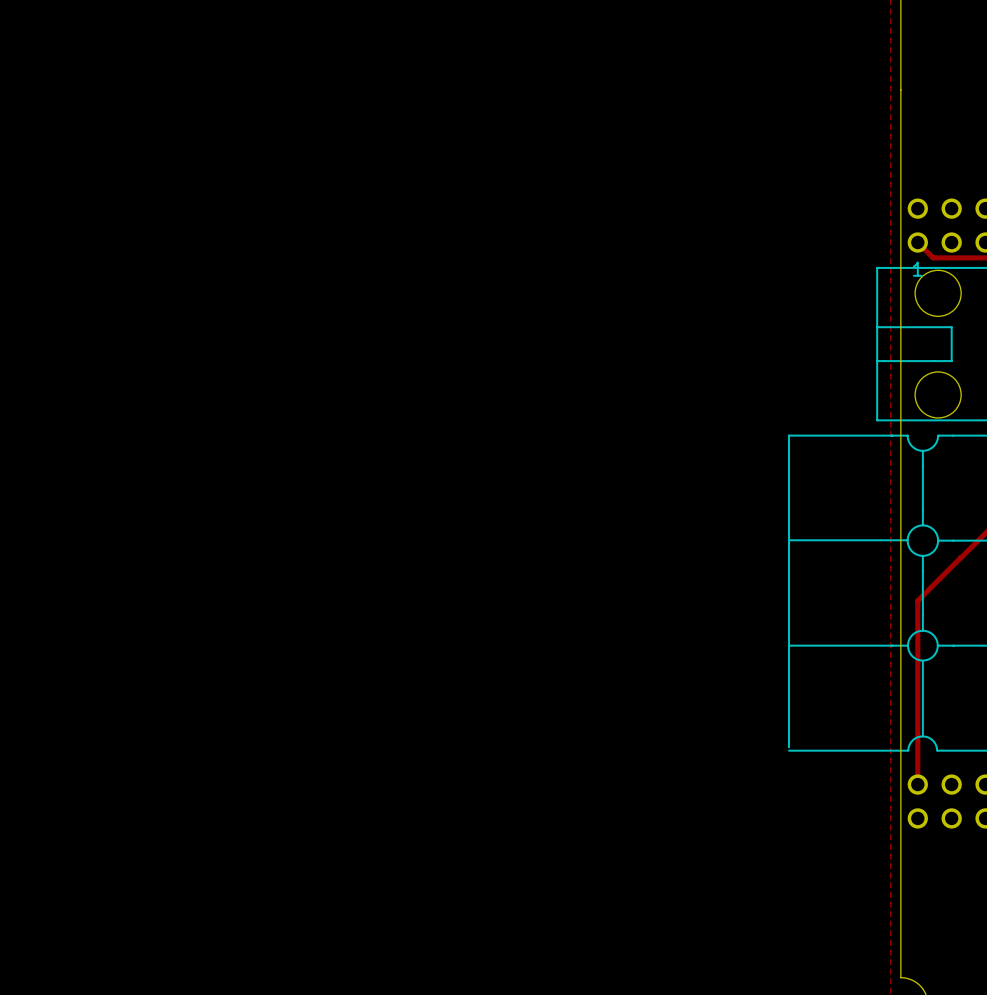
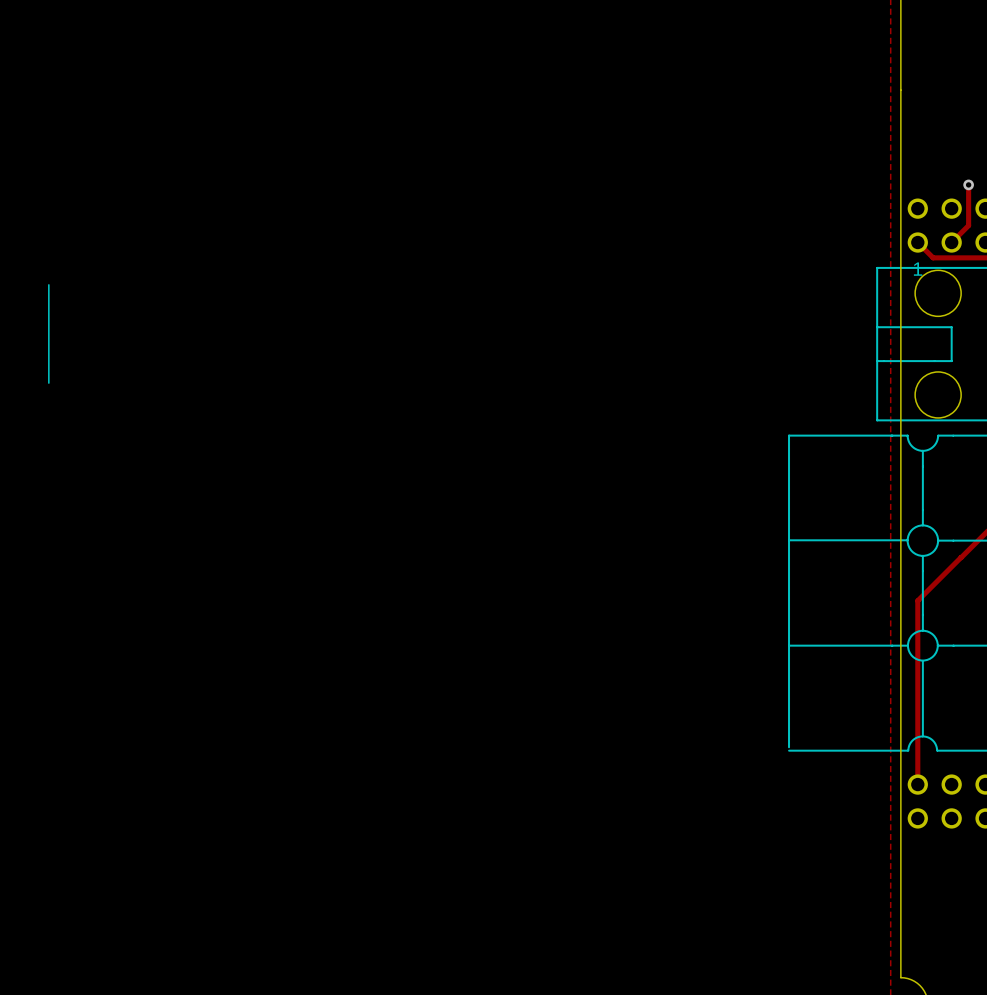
track: none -> (968, 184) (968, 225) (951, 242)
via: none -> (968, 184)
line: none -> (48, 284) (48, 383)

